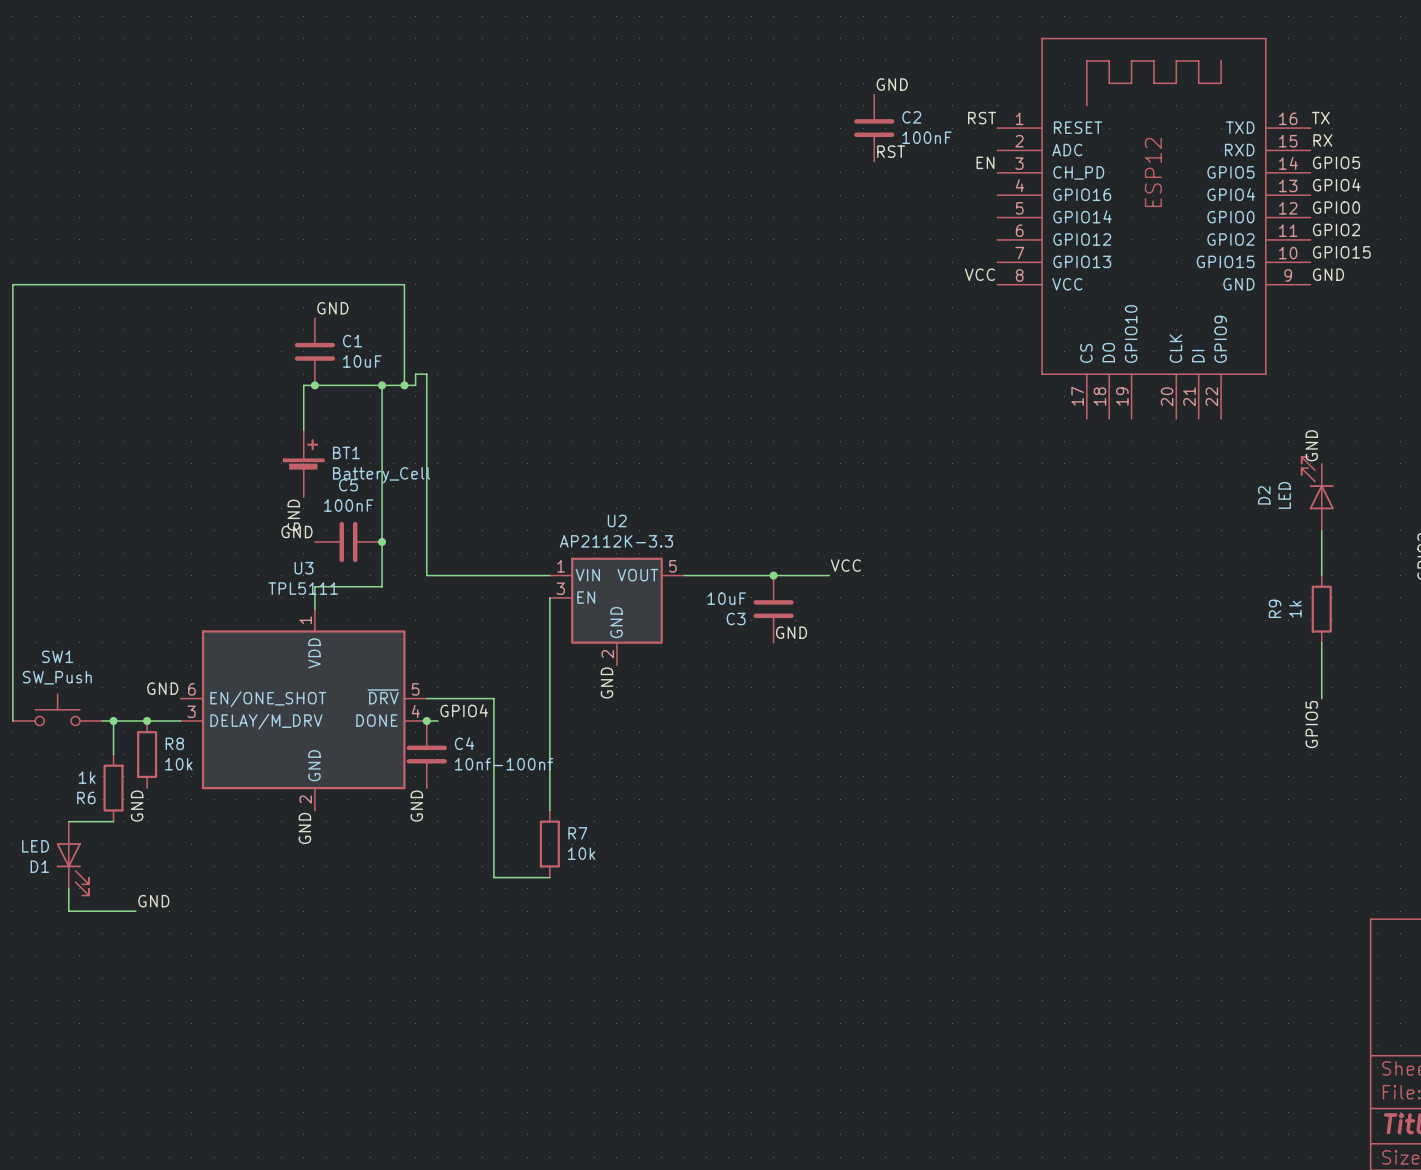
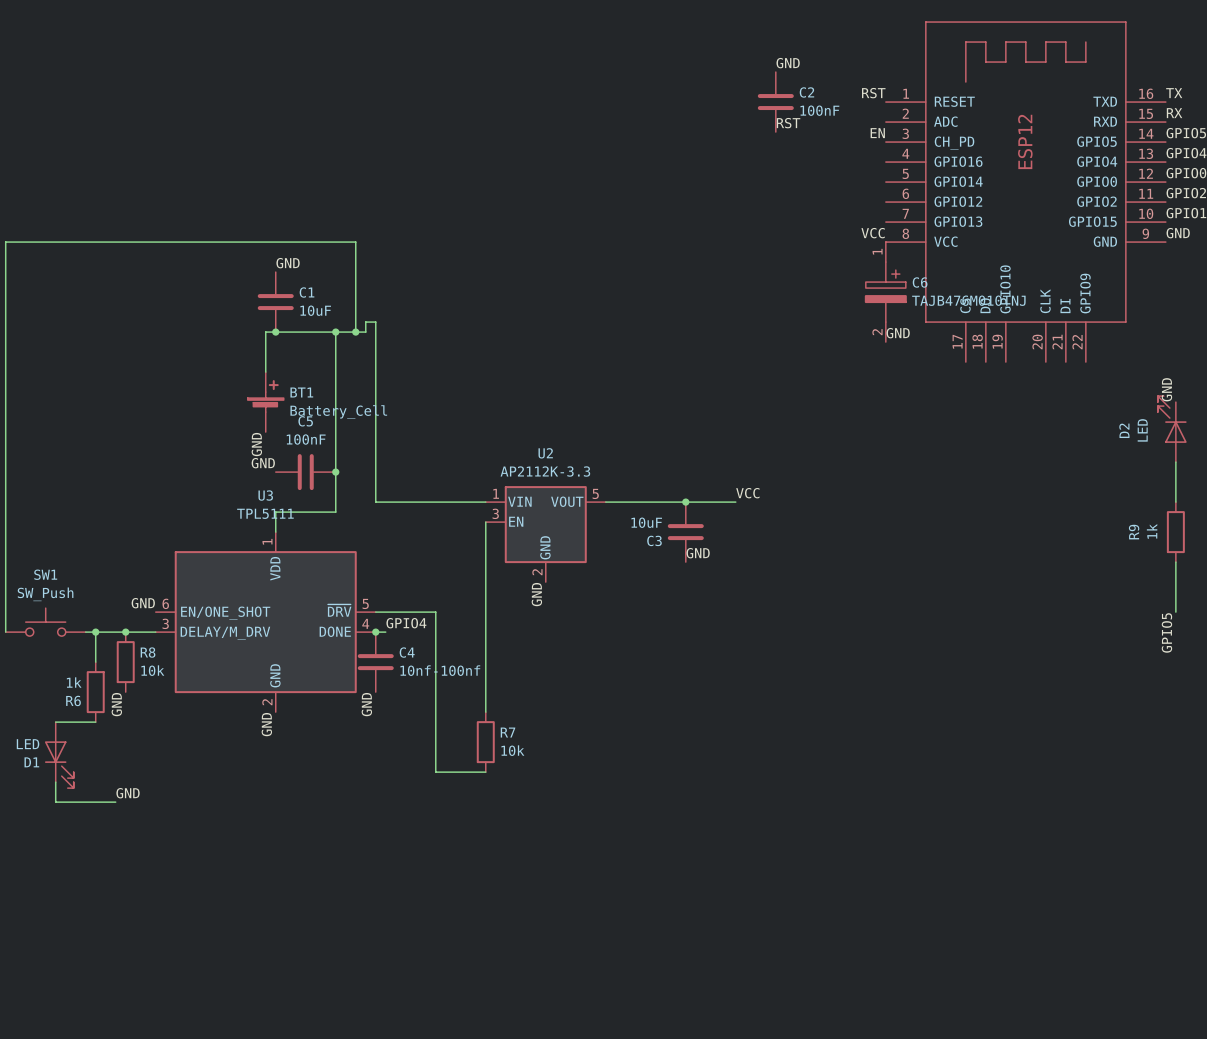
C6: none -> TAJB476M010TNJ (885, 292)
label: none -> GND (898, 333)

